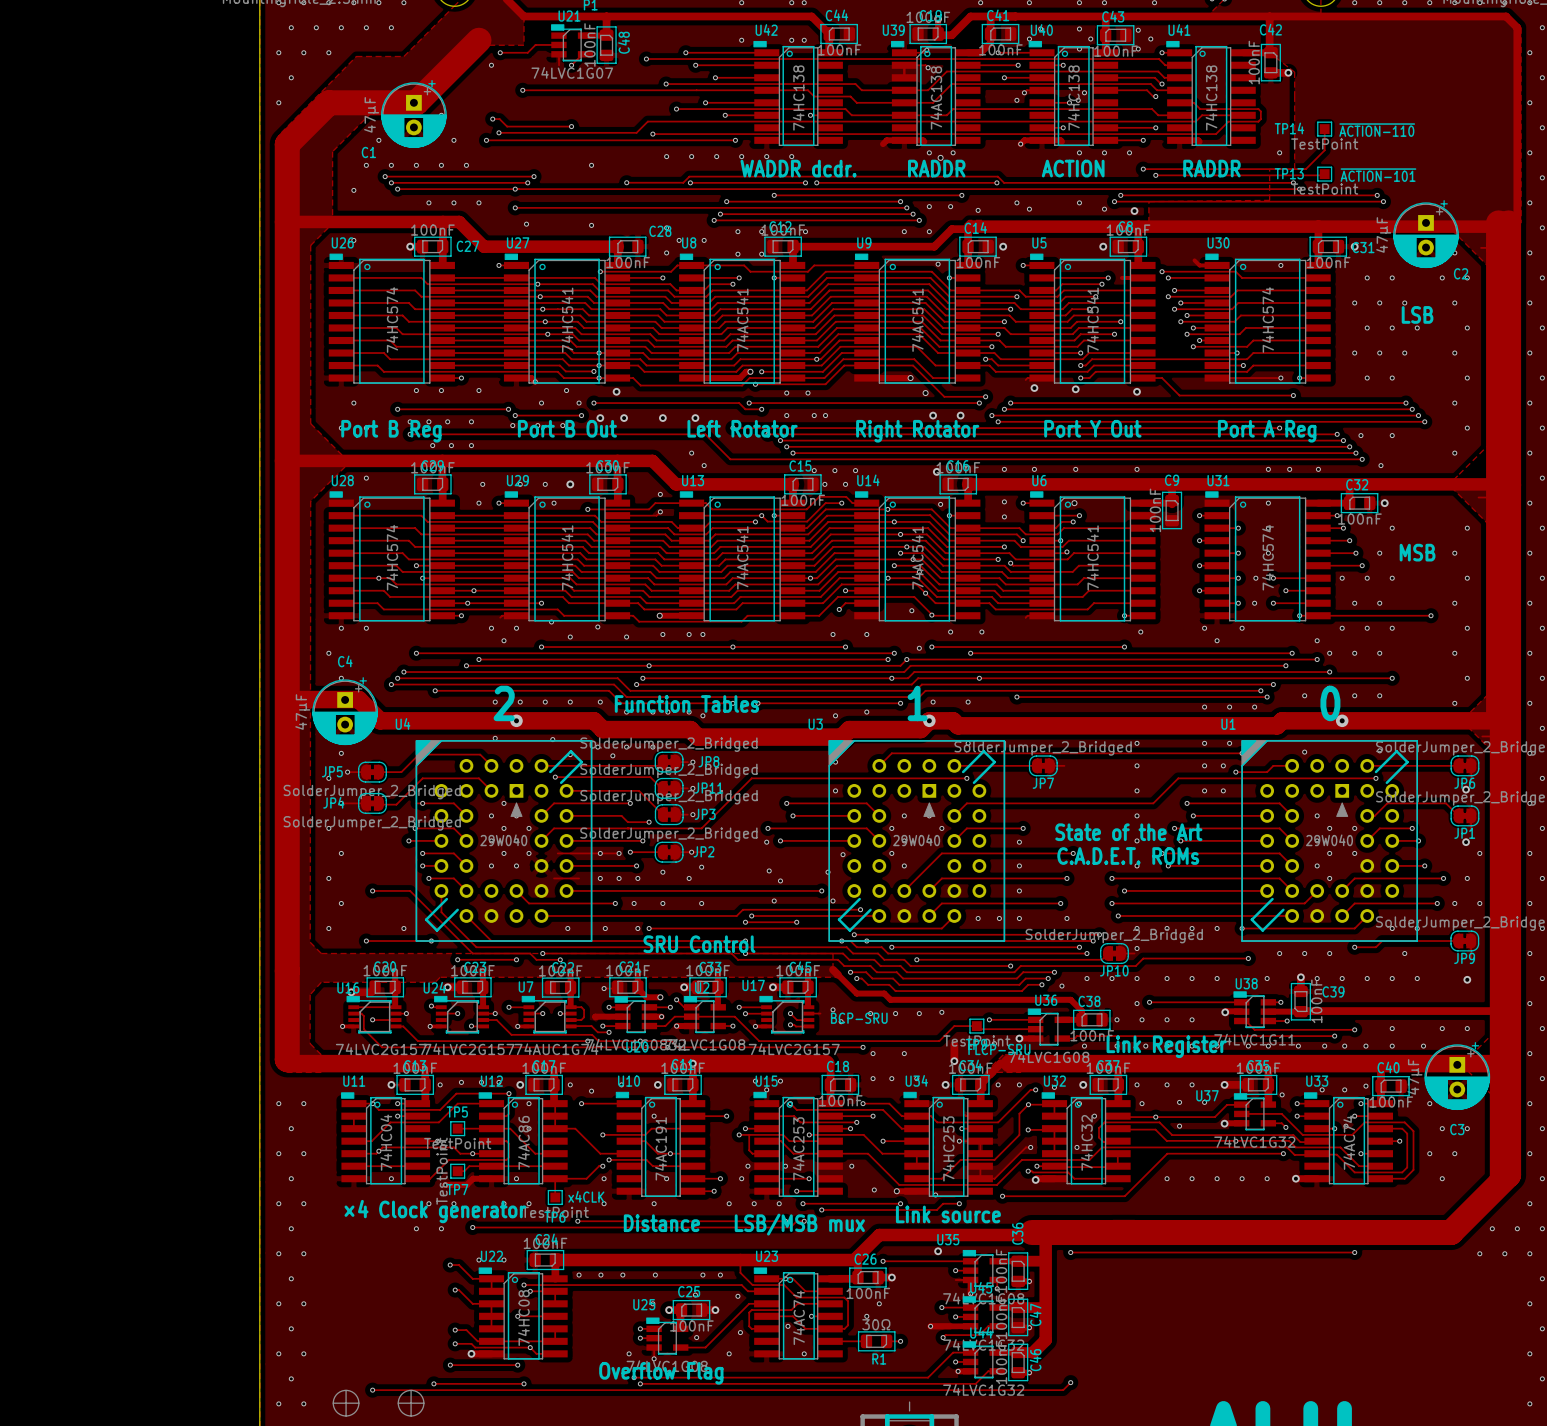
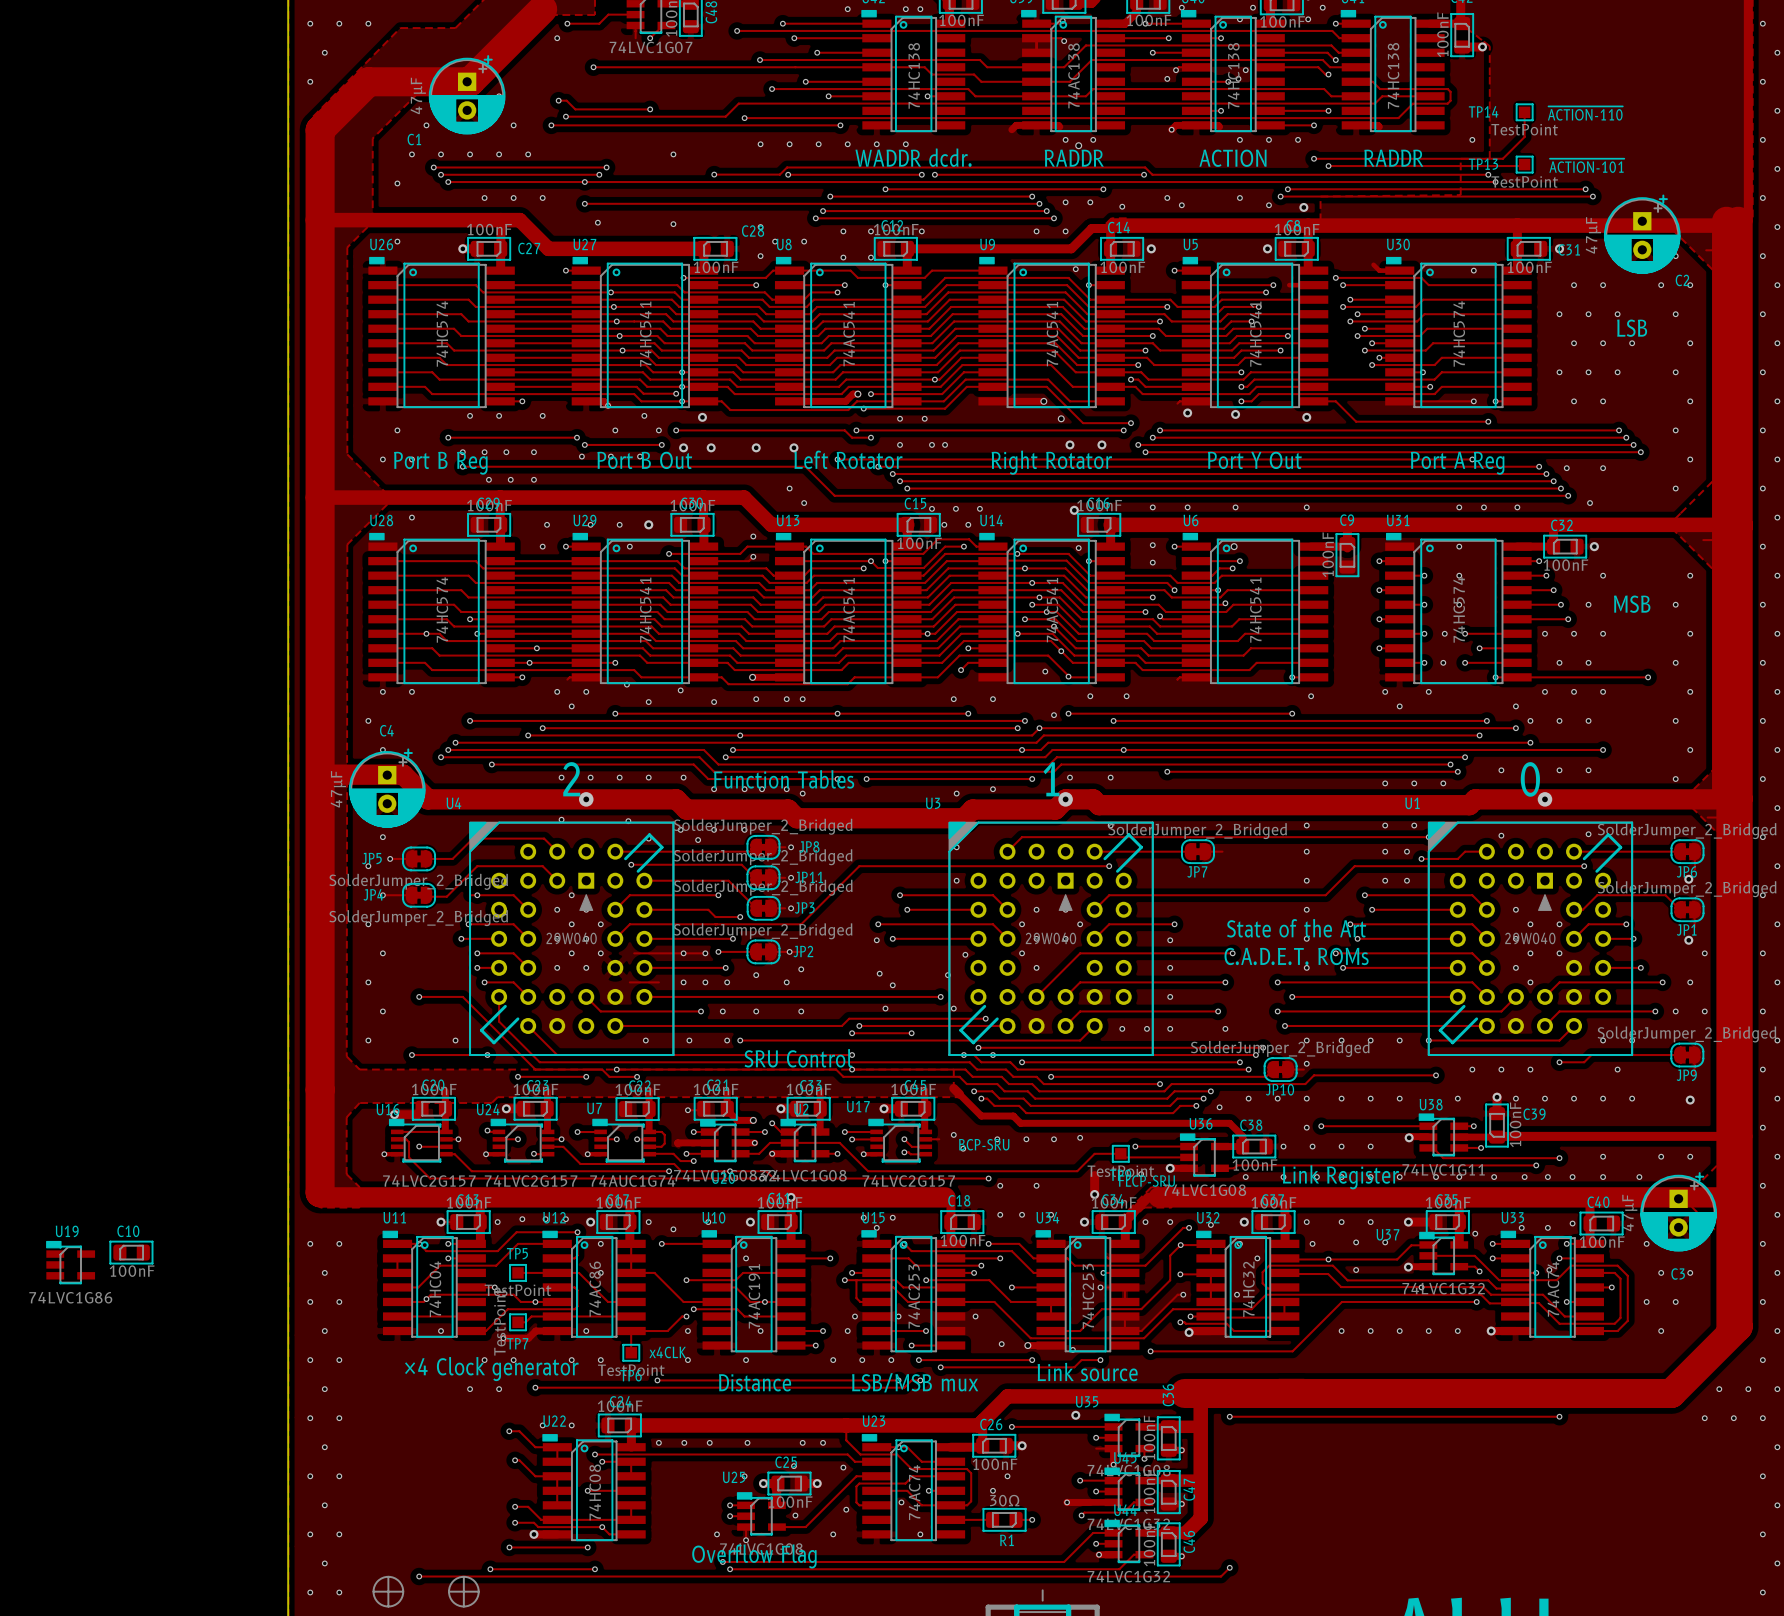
C10: none -> 100nF (131, 1252)
U19: none -> 74LVC1G86 (70, 1262)

